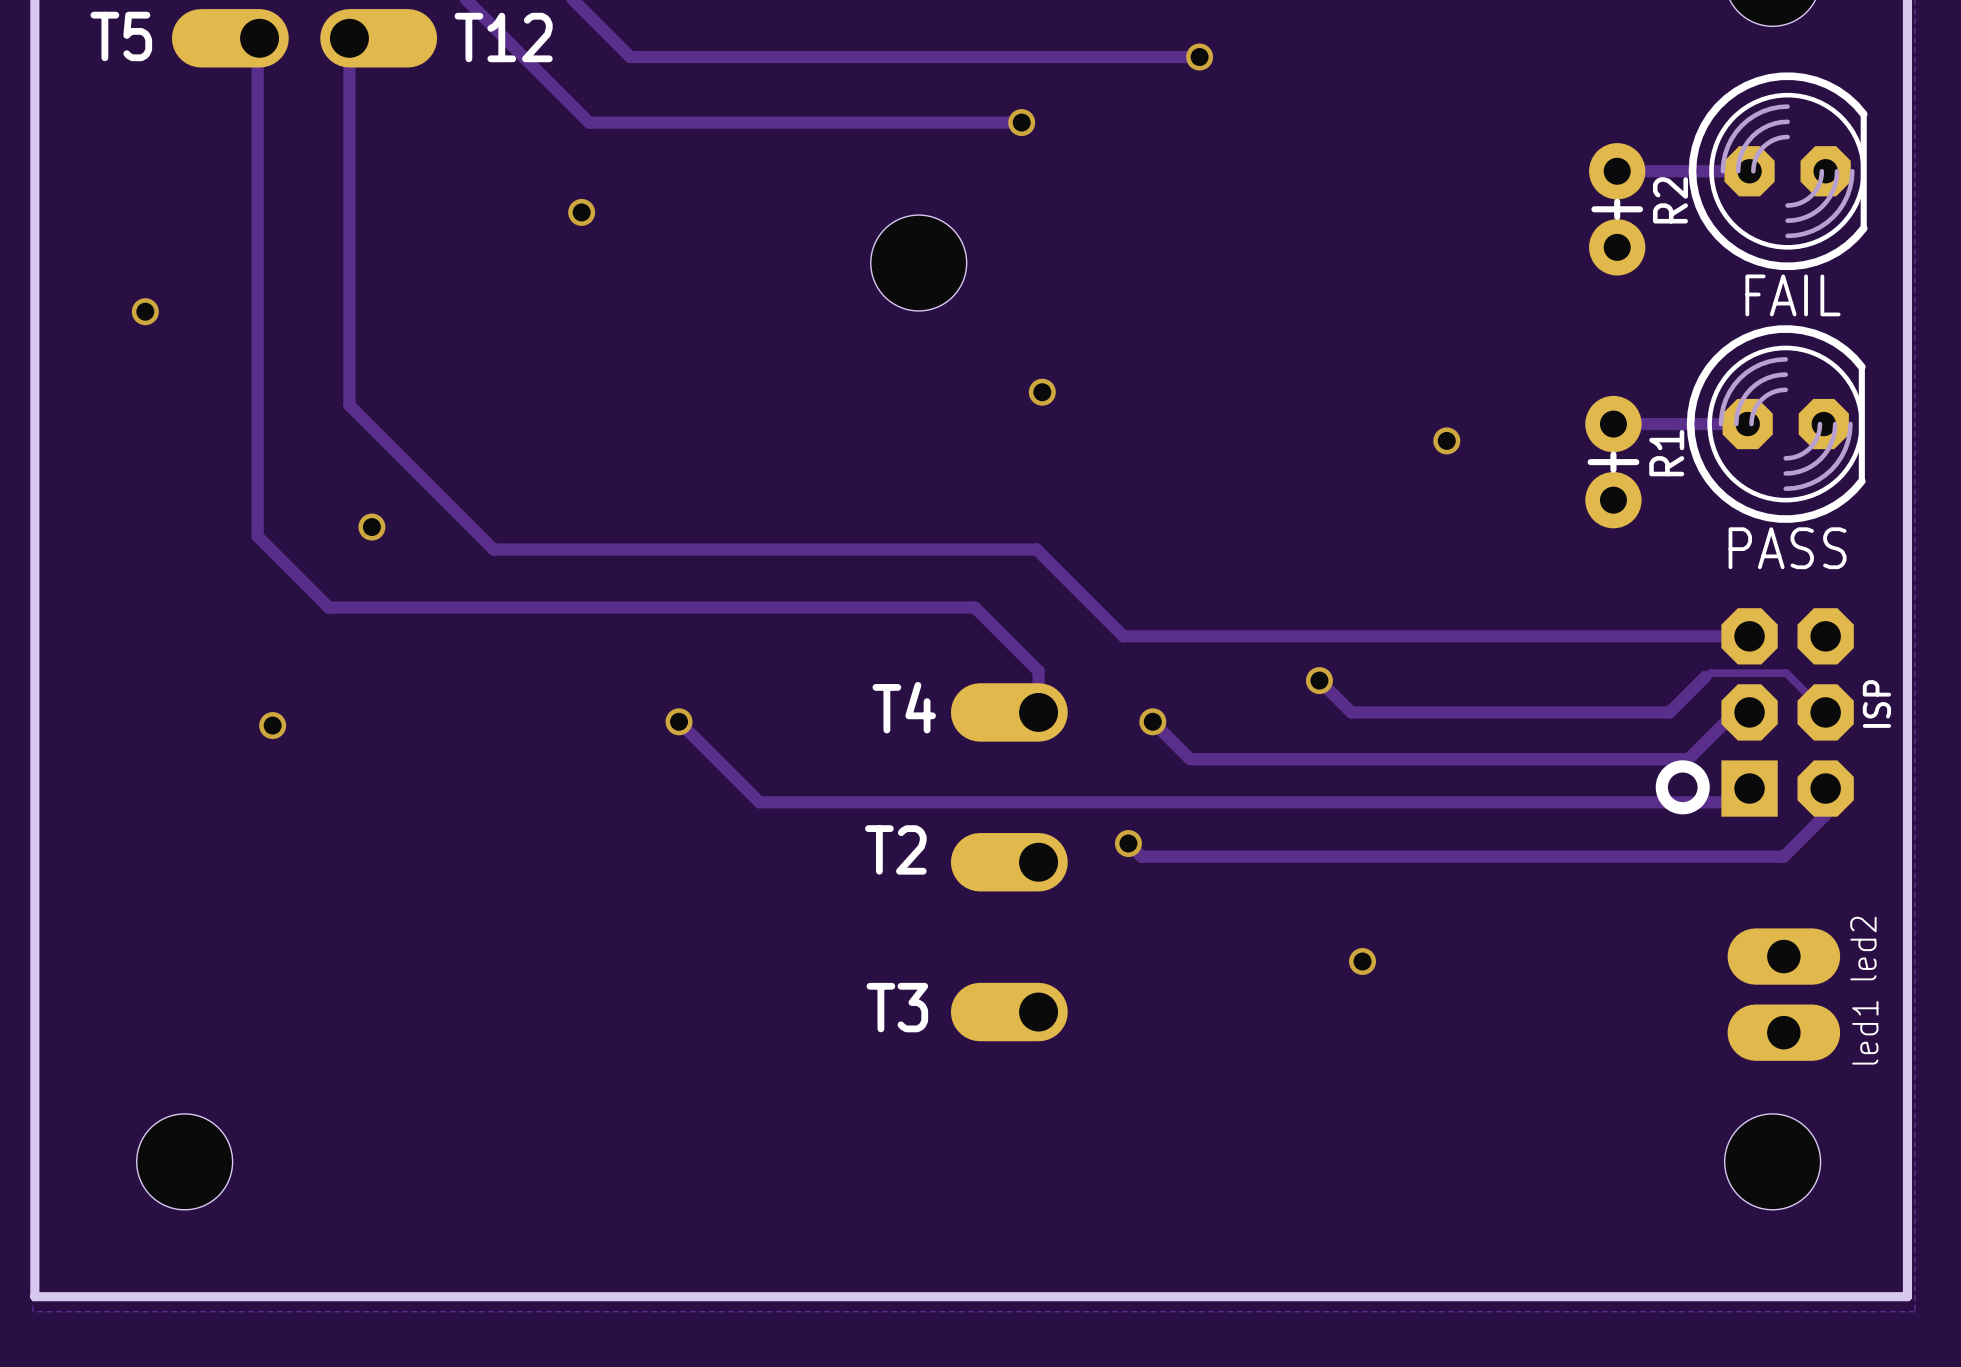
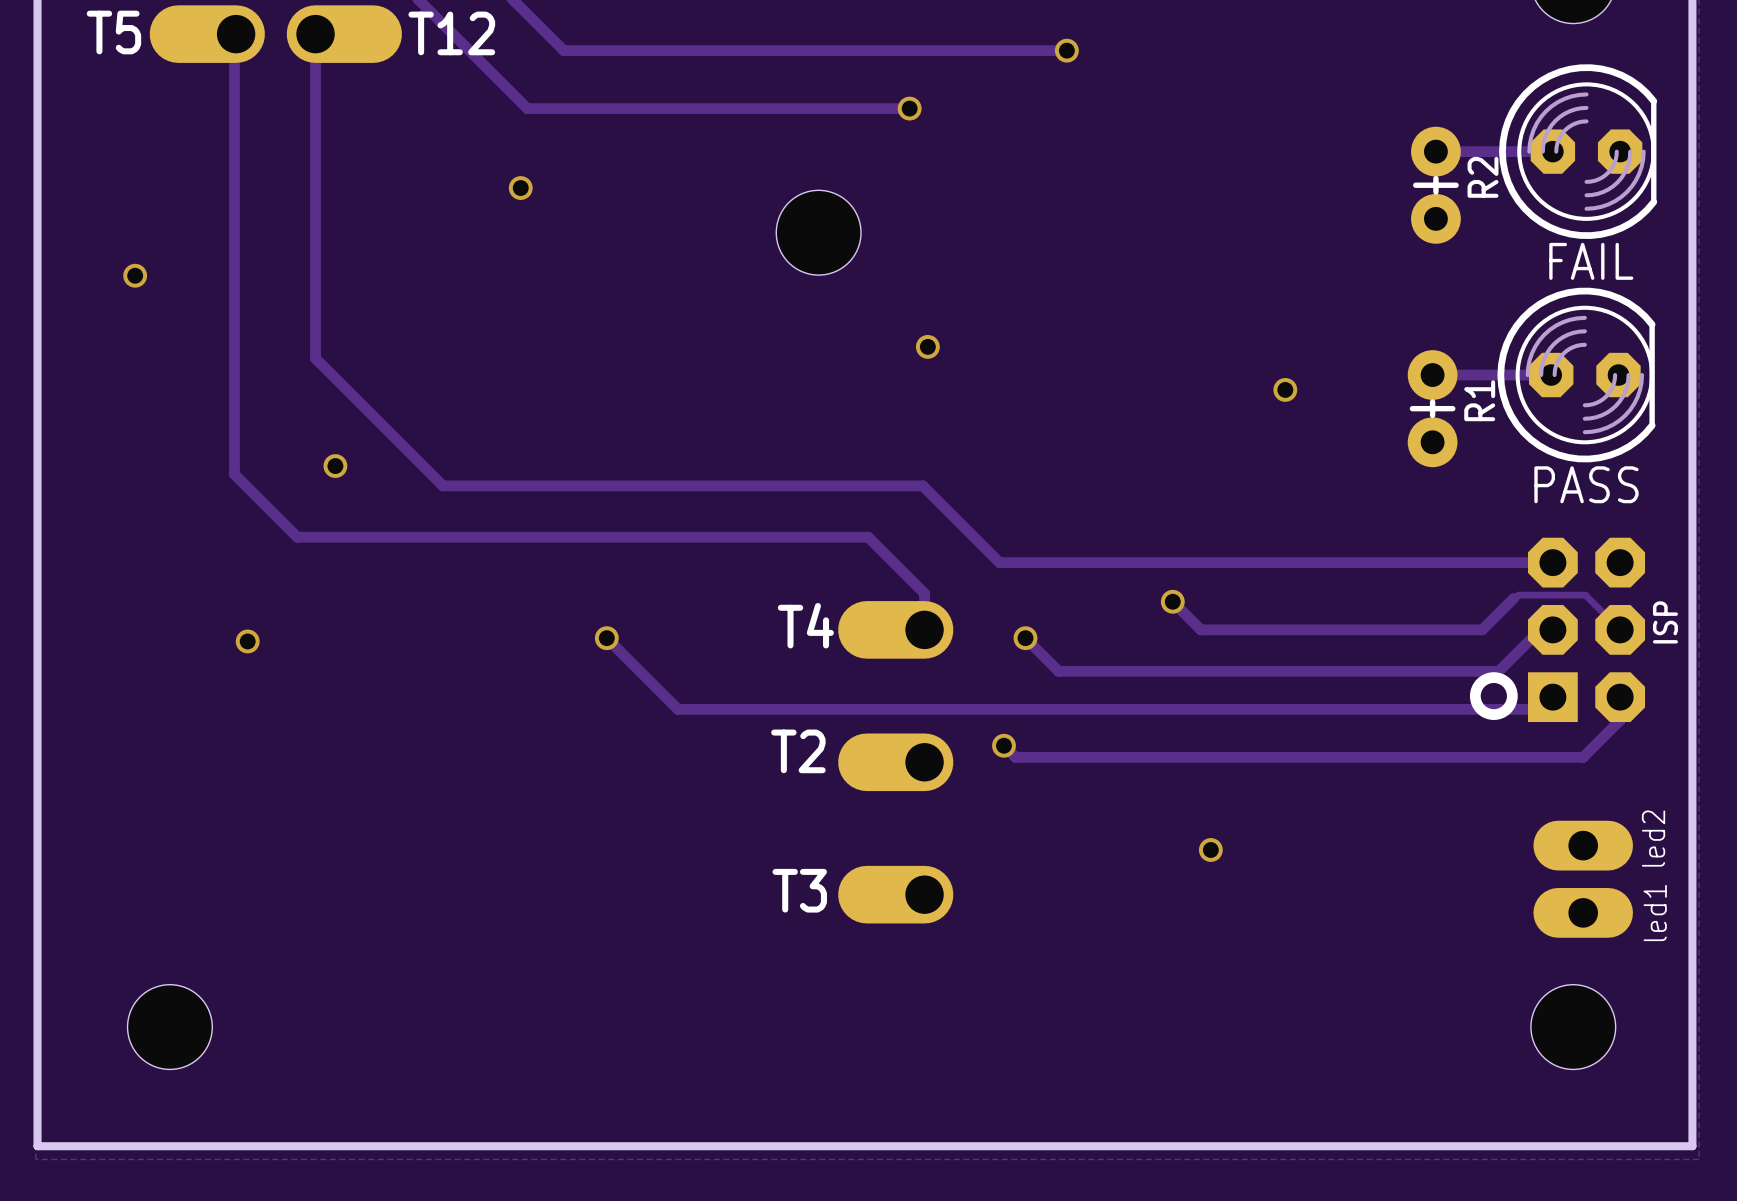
T5 footprint: [171, 9, 289, 68] -> [149, 5, 265, 63]
T12 footprint: [320, 9, 438, 68] -> [286, 5, 402, 63]
T4 footprint: [950, 683, 1068, 742] -> [838, 601, 954, 659]
T2 footprint: [950, 833, 1068, 892] -> [838, 733, 954, 792]
T3 footprint: [950, 982, 1068, 1042] -> [838, 865, 954, 924]

